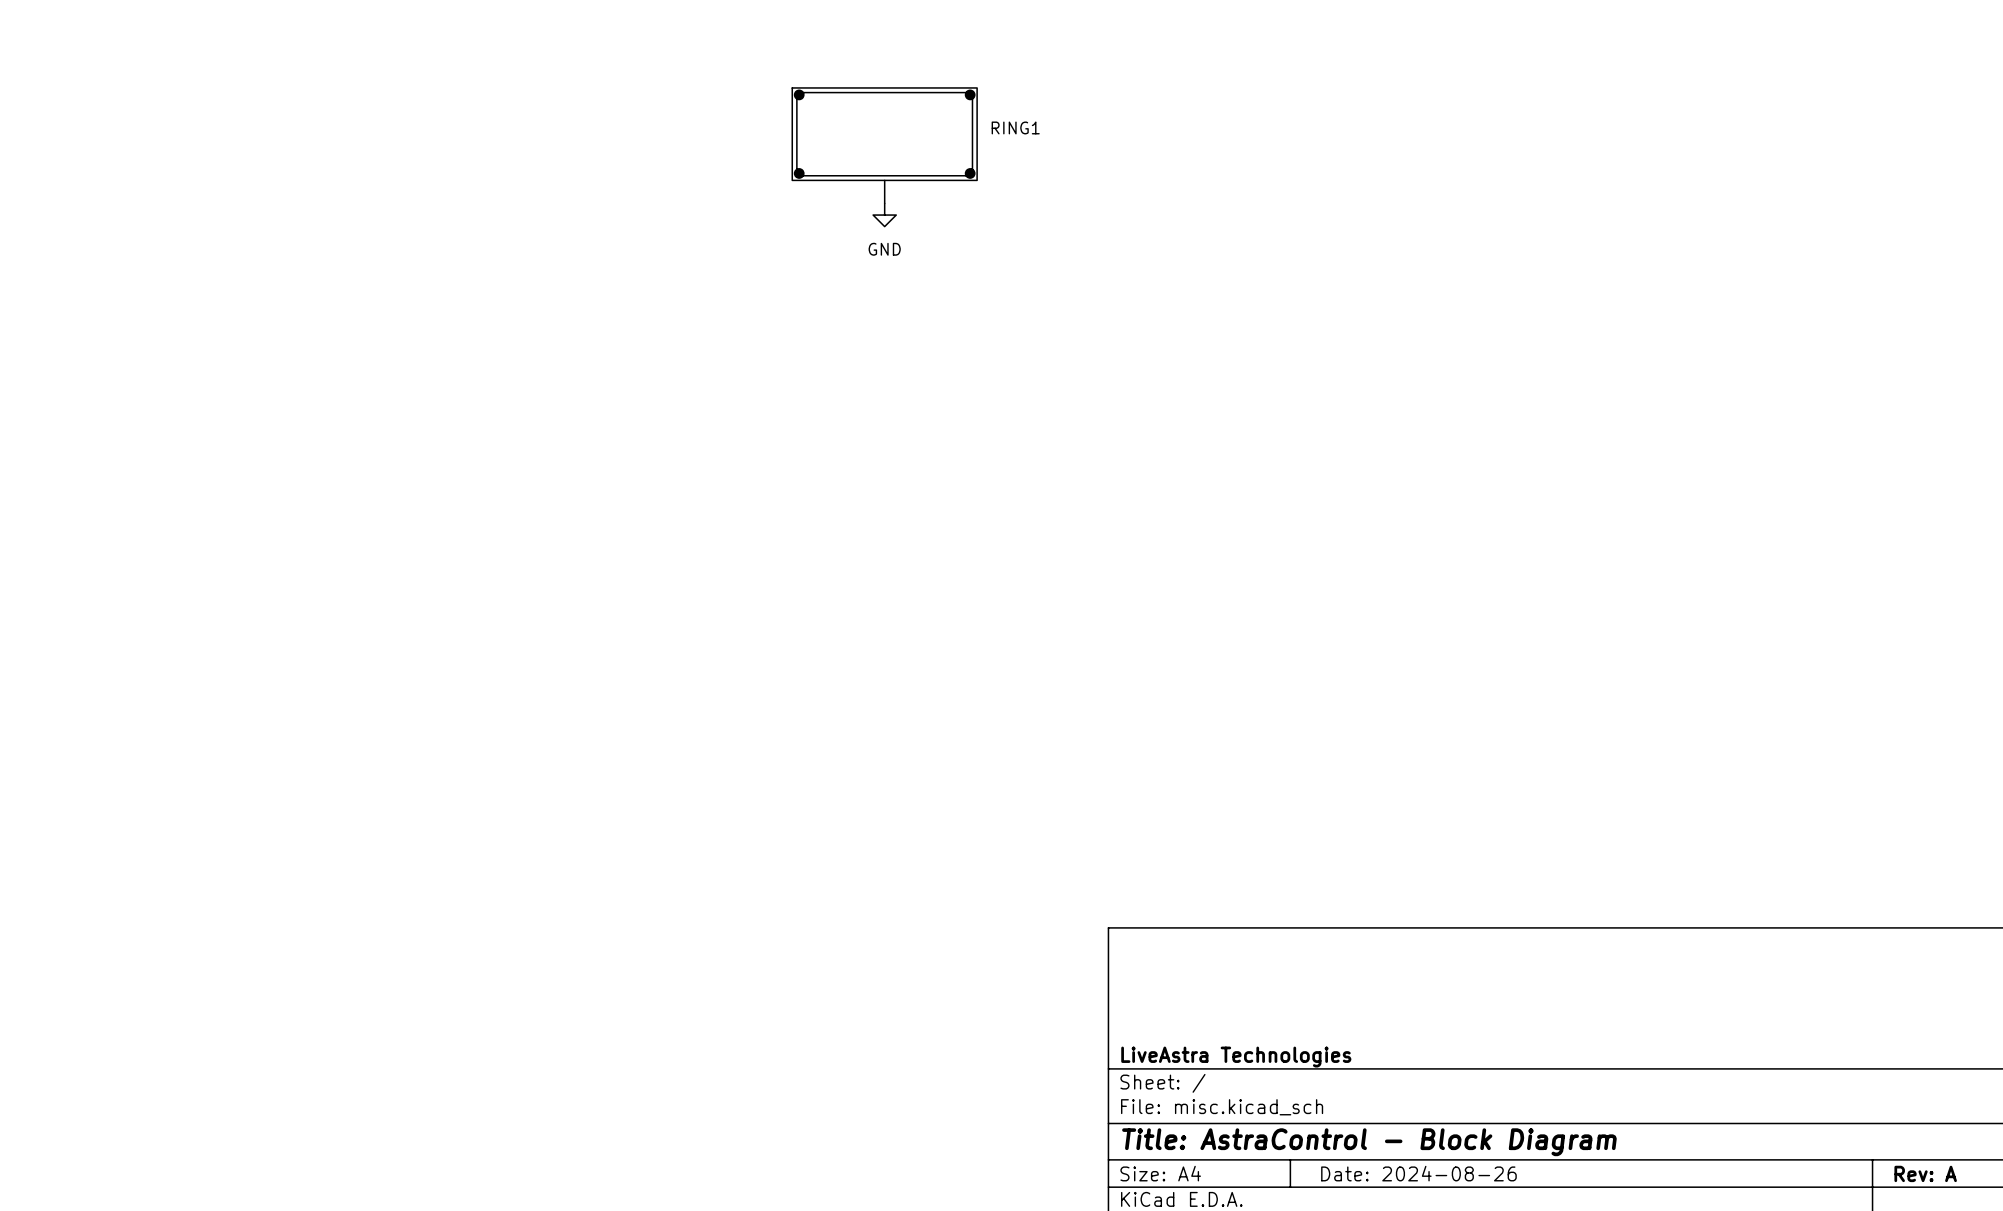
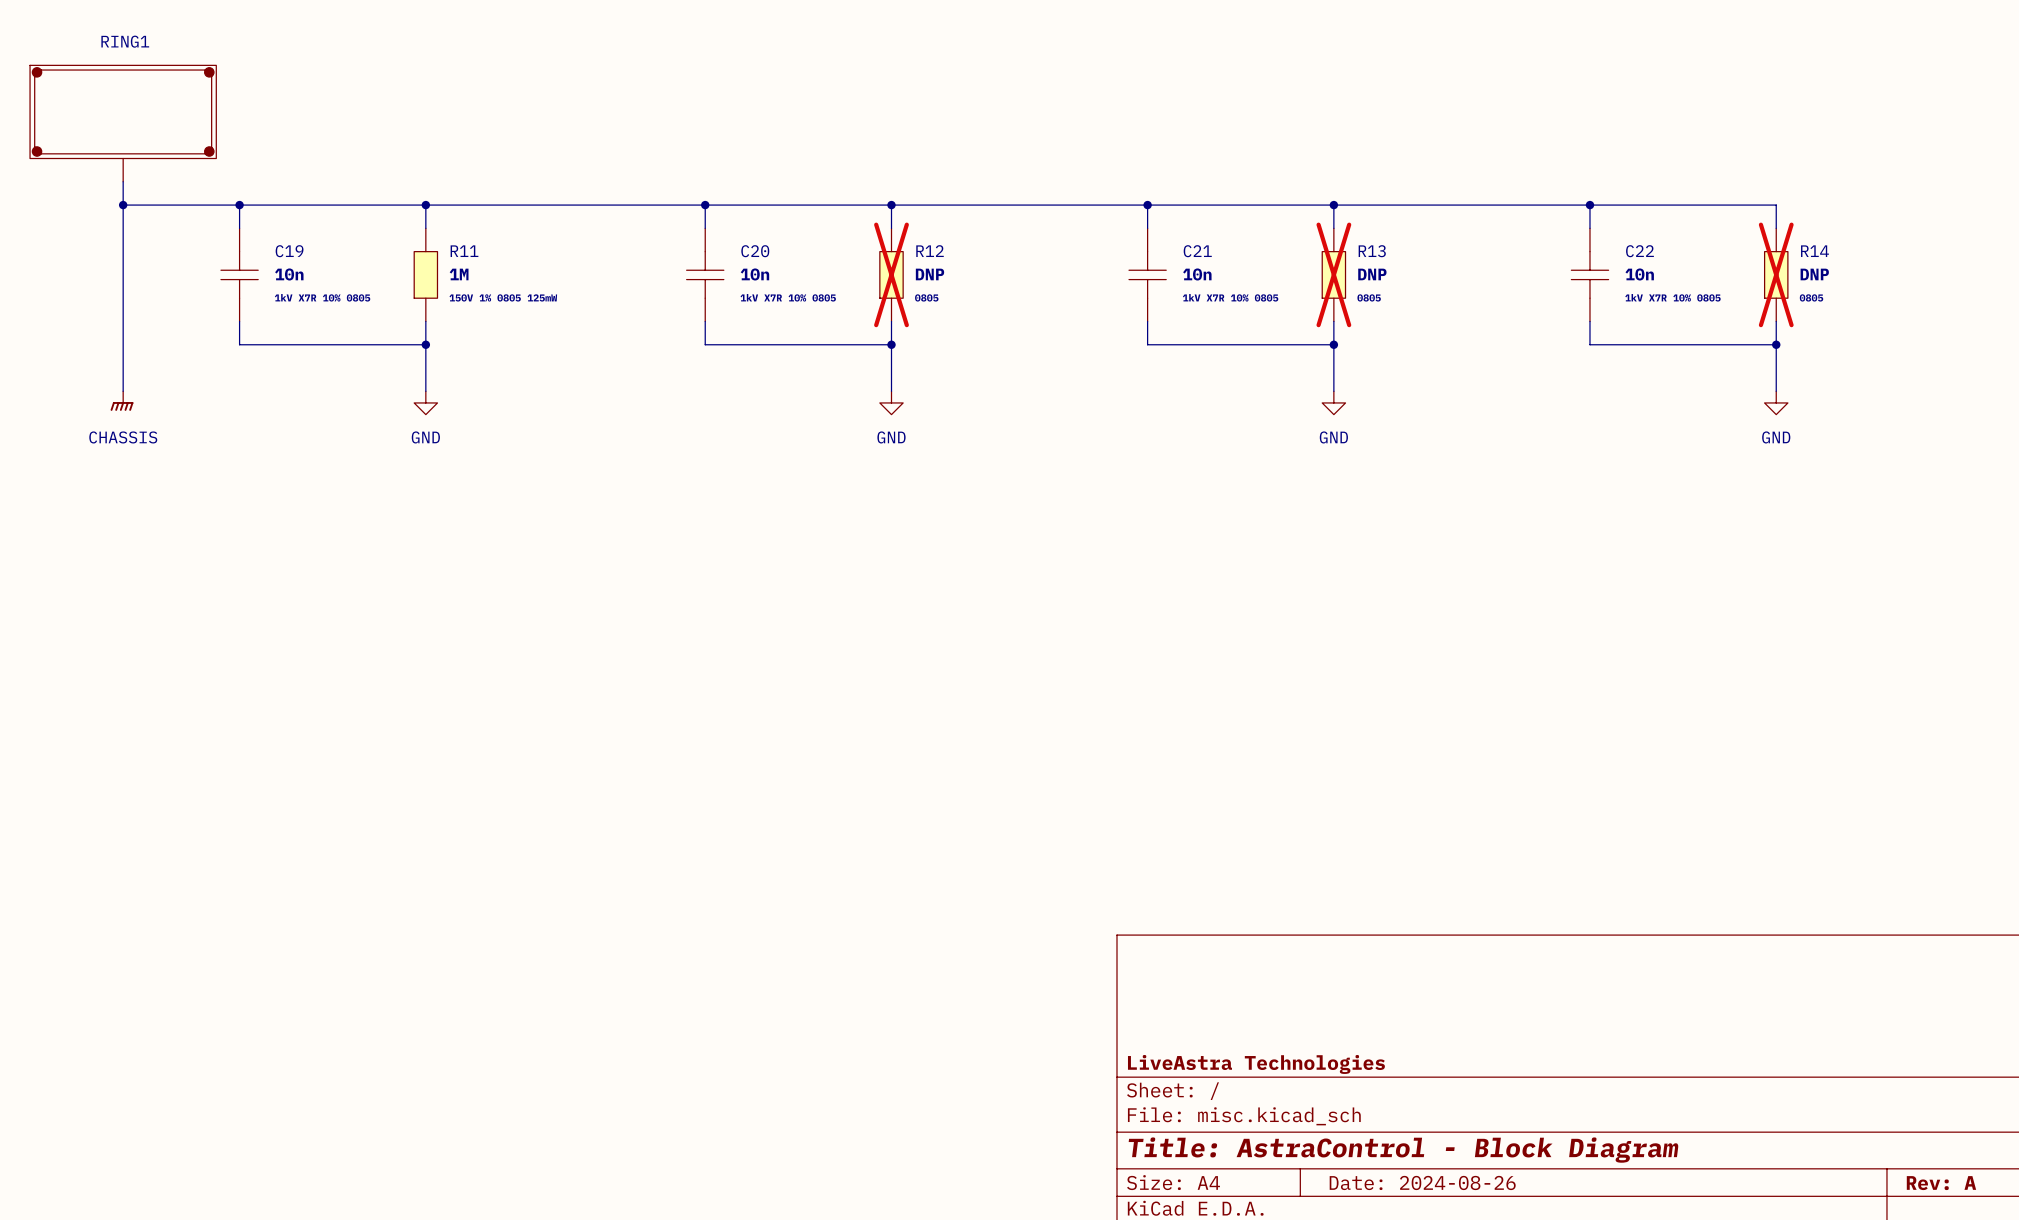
RING1 name position: RING1 (1015, 127) -> RING1 (125, 41)
RING1 position: (884, 145) -> (123, 123)
wire: none -> (123, 181) (123, 391)
wire: none -> (123, 205) (1776, 205) (1776, 228)
junction: none -> (123, 205)
wire: none -> (239, 205) (239, 228)
junction: none -> (239, 205)
wire: none -> (425, 205) (425, 228)
junction: none -> (425, 205)
wire: none -> (705, 205) (705, 228)
junction: none -> (705, 205)
junction: none -> (891, 205)
wire: none -> (1147, 205) (1147, 228)
junction: none -> (1147, 205)
wire: none -> (1333, 205) (1333, 228)
junction: none -> (1333, 205)
wire: none -> (1589, 205) (1589, 228)
junction: none -> (1589, 205)
power symbol position: GND (884, 215) -> GND (891, 402)
C19: none -> 10n (239, 274)
R11: none -> 1M (425, 274)
C20: none -> 10n (705, 274)
R12: none -> DNP (891, 274)
C21: none -> 10n (1147, 274)
R13: none -> DNP (1333, 274)
C22: none -> 10n (1589, 274)
R14: none -> DNP (1776, 274)
wire: none -> (239, 321) (239, 344) (425, 344)
wire: none -> (425, 321) (425, 391)
wire: none -> (705, 321) (705, 344) (891, 344)
wire: none -> (891, 321) (891, 391)
wire: none -> (1147, 321) (1147, 344) (1333, 344)
wire: none -> (1333, 321) (1333, 391)
wire: none -> (1589, 321) (1589, 344) (1776, 344)
wire: none -> (1776, 321) (1776, 391)
junction: none -> (425, 344)
junction: none -> (891, 344)
junction: none -> (1333, 344)
junction: none -> (1776, 344)
power symbol: none -> CHASSIS (122, 401)
power symbol: none -> GND (425, 402)
power symbol: none -> GND (1333, 402)
power symbol: none -> GND (1776, 402)

